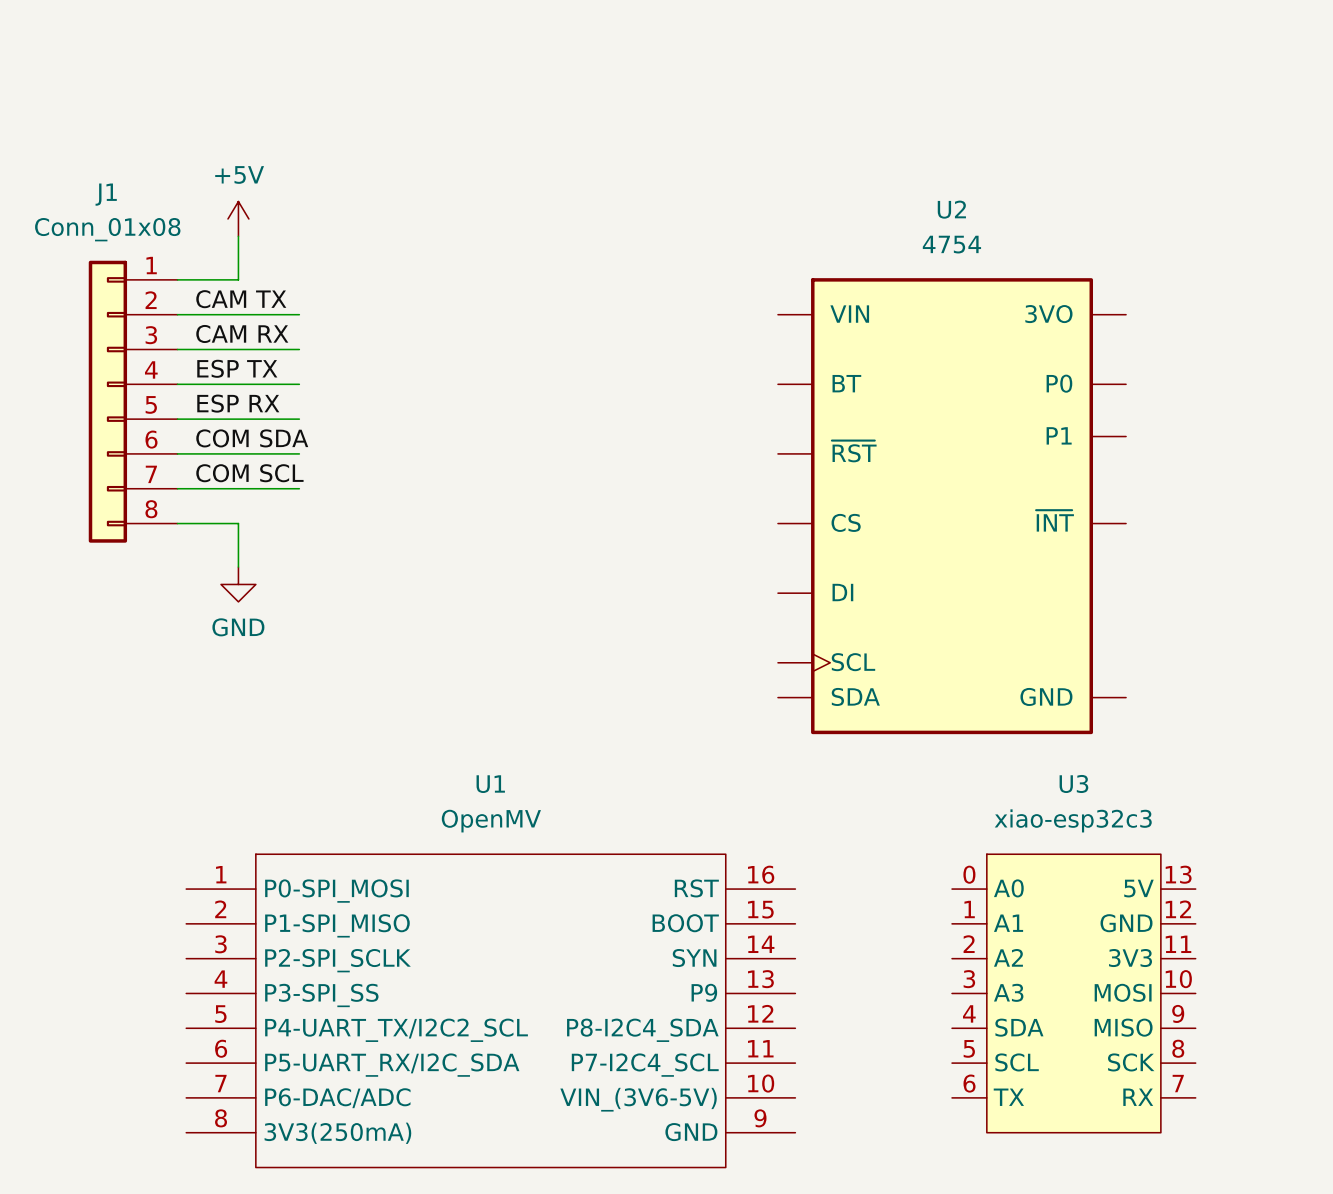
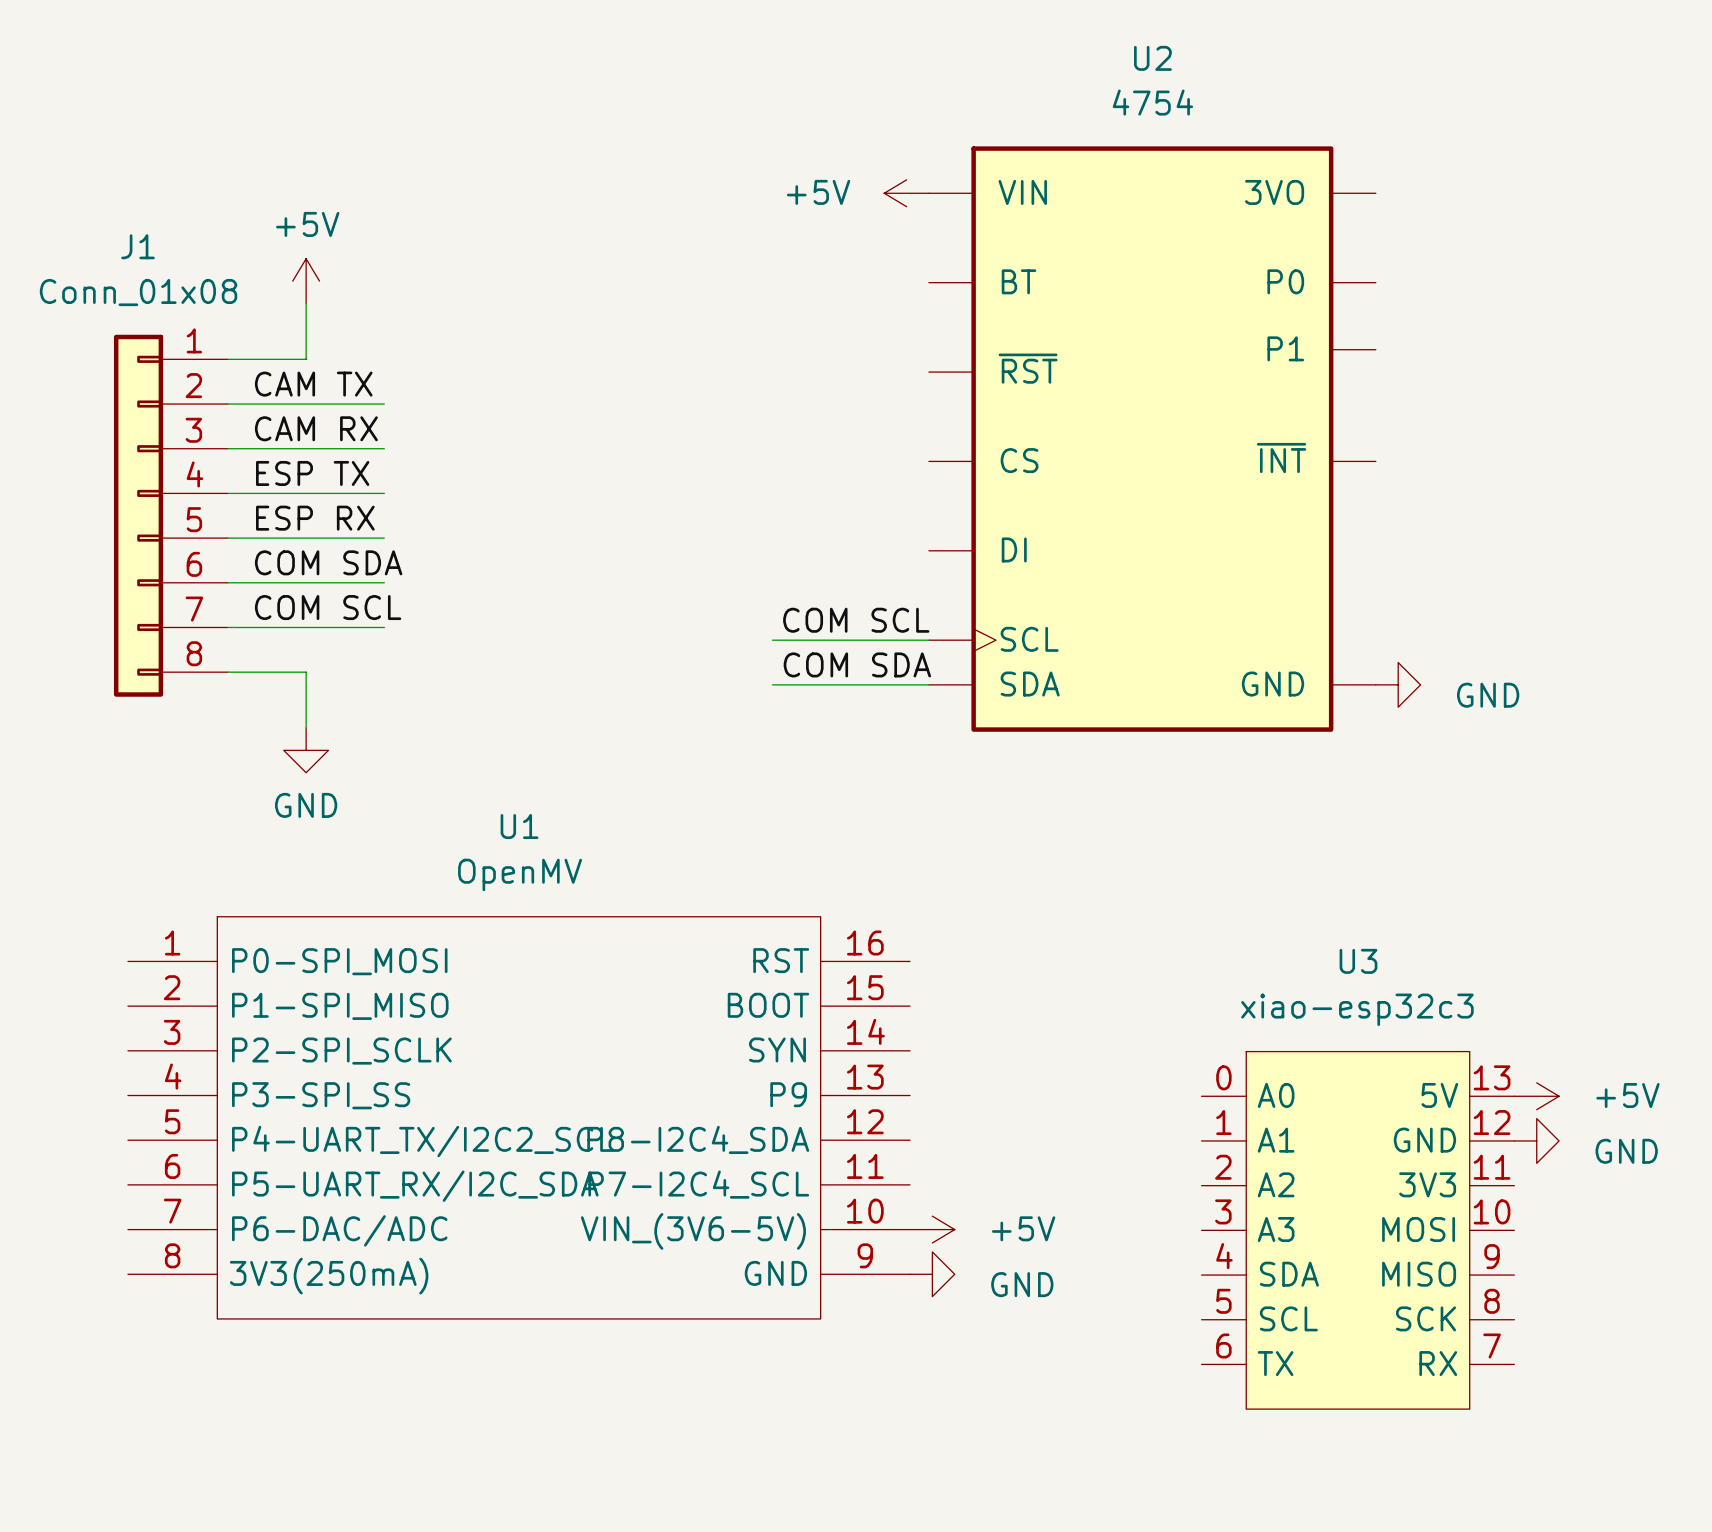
power symbol: none -> +5V (906, 193)
label: none -> COM SCL (856, 620)
wire: none -> (772, 640) (928, 640)
U2 position: (952, 506) -> (1152, 439)
label: none -> COM SDA (857, 664)
wire: none -> (772, 684) (928, 684)
power symbol: none -> GND (1398, 684)
power symbol: none -> +5V (1536, 1096)
power symbol: none -> GND (1536, 1140)
power symbol: none -> +5V (932, 1229)
power symbol: none -> GND (932, 1274)
U3 position: (1073, 993) -> (1357, 1230)
U1 position: (490, 1010) -> (518, 1117)

